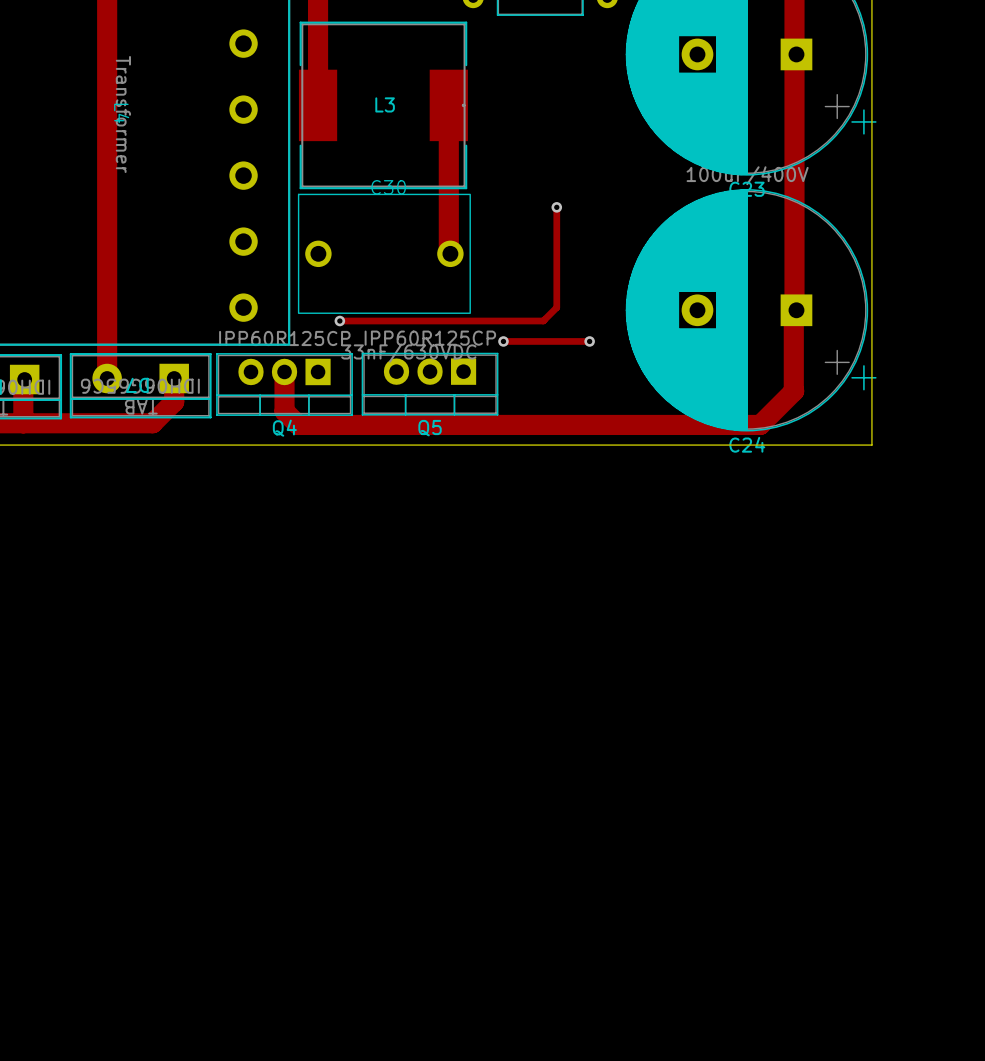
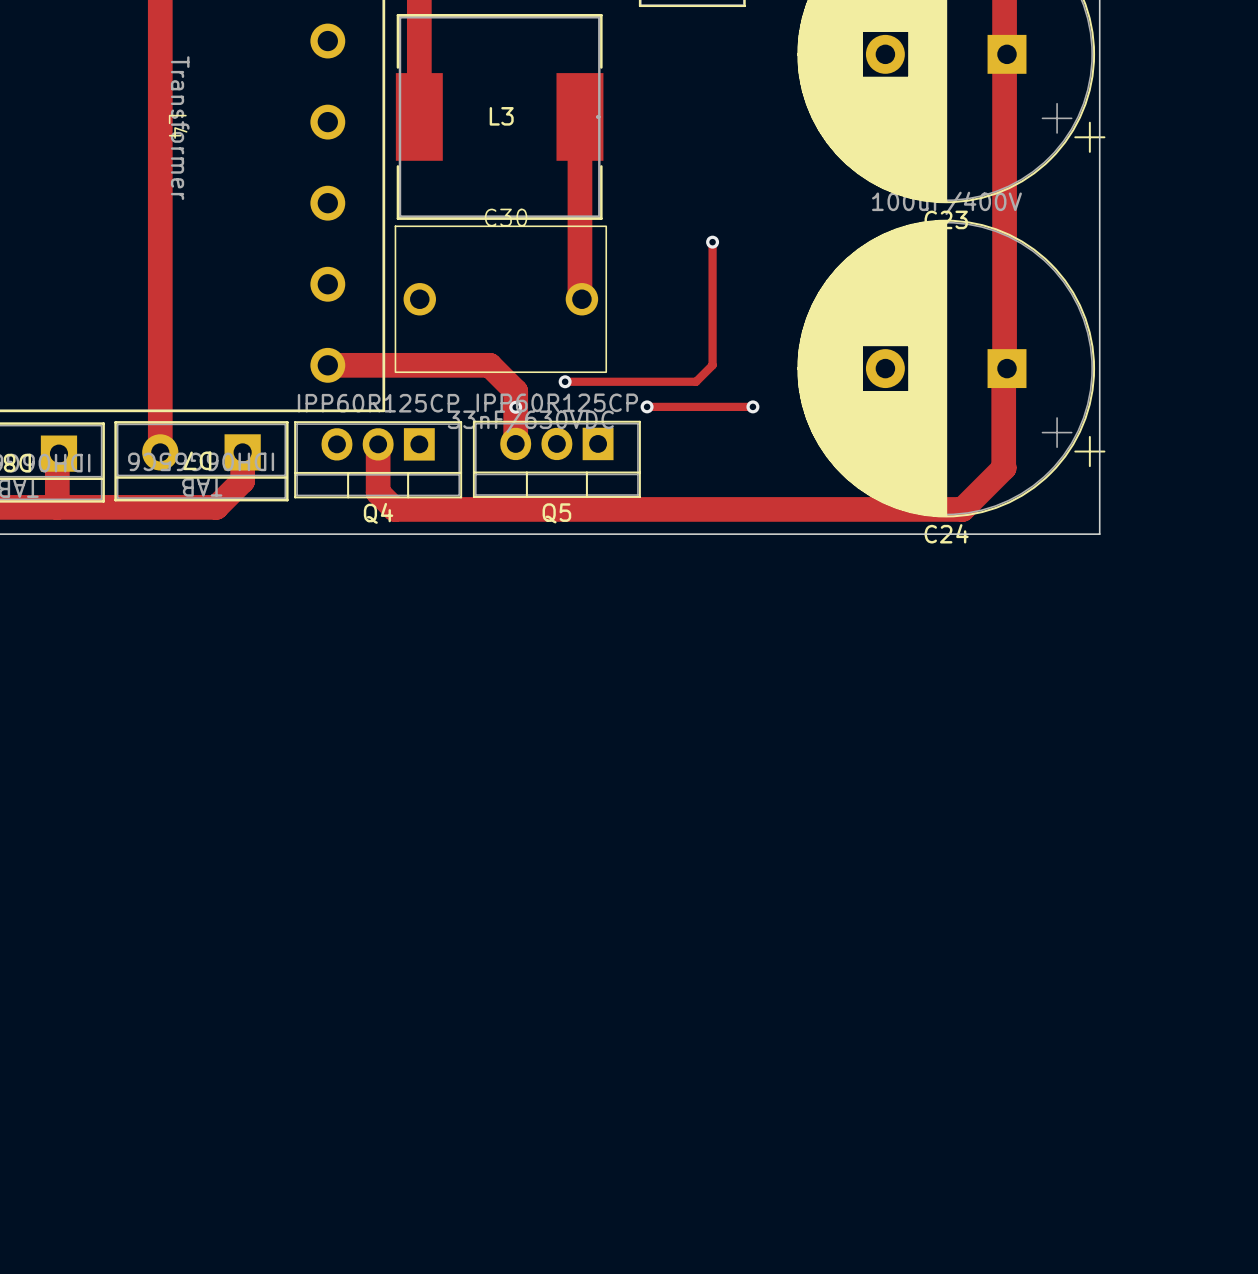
track: none -> (327, 365) (489, 365) (515, 391) (515, 443)
track: (339, 321) (436, 321) -> none
via: (339, 321) -> none
via: none -> (565, 381)
via: none -> (515, 407)

